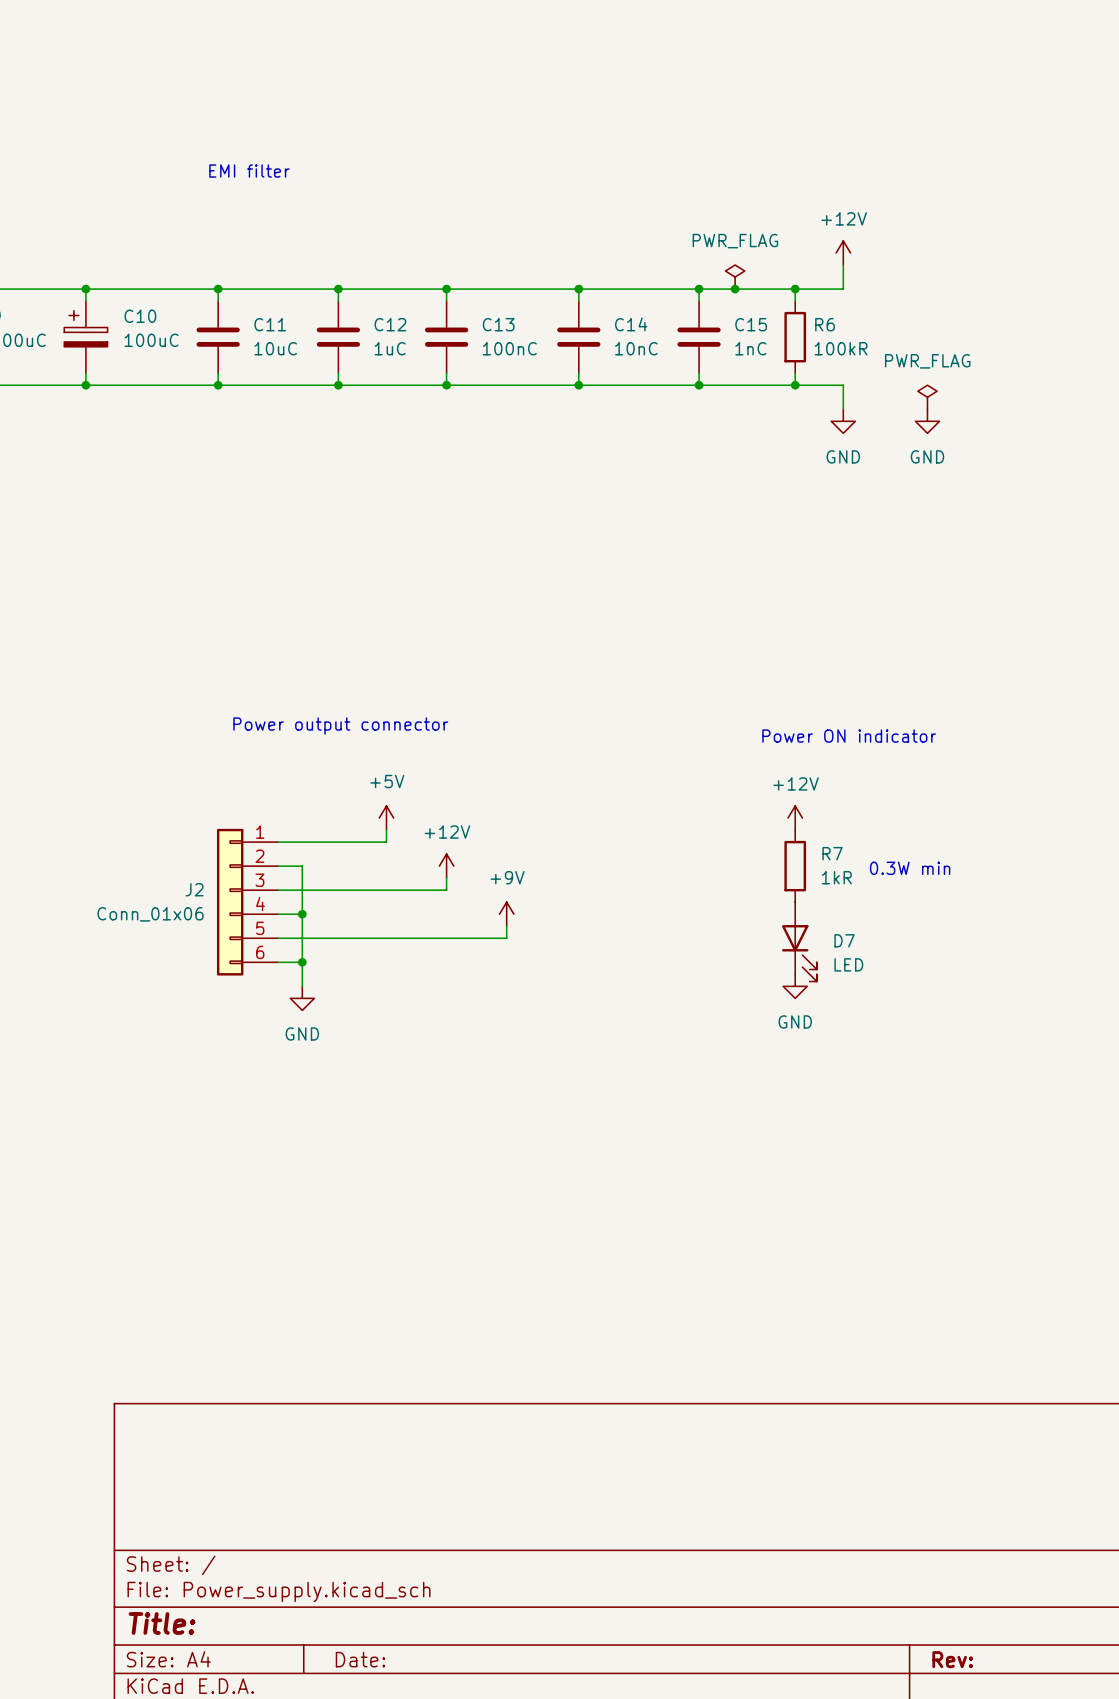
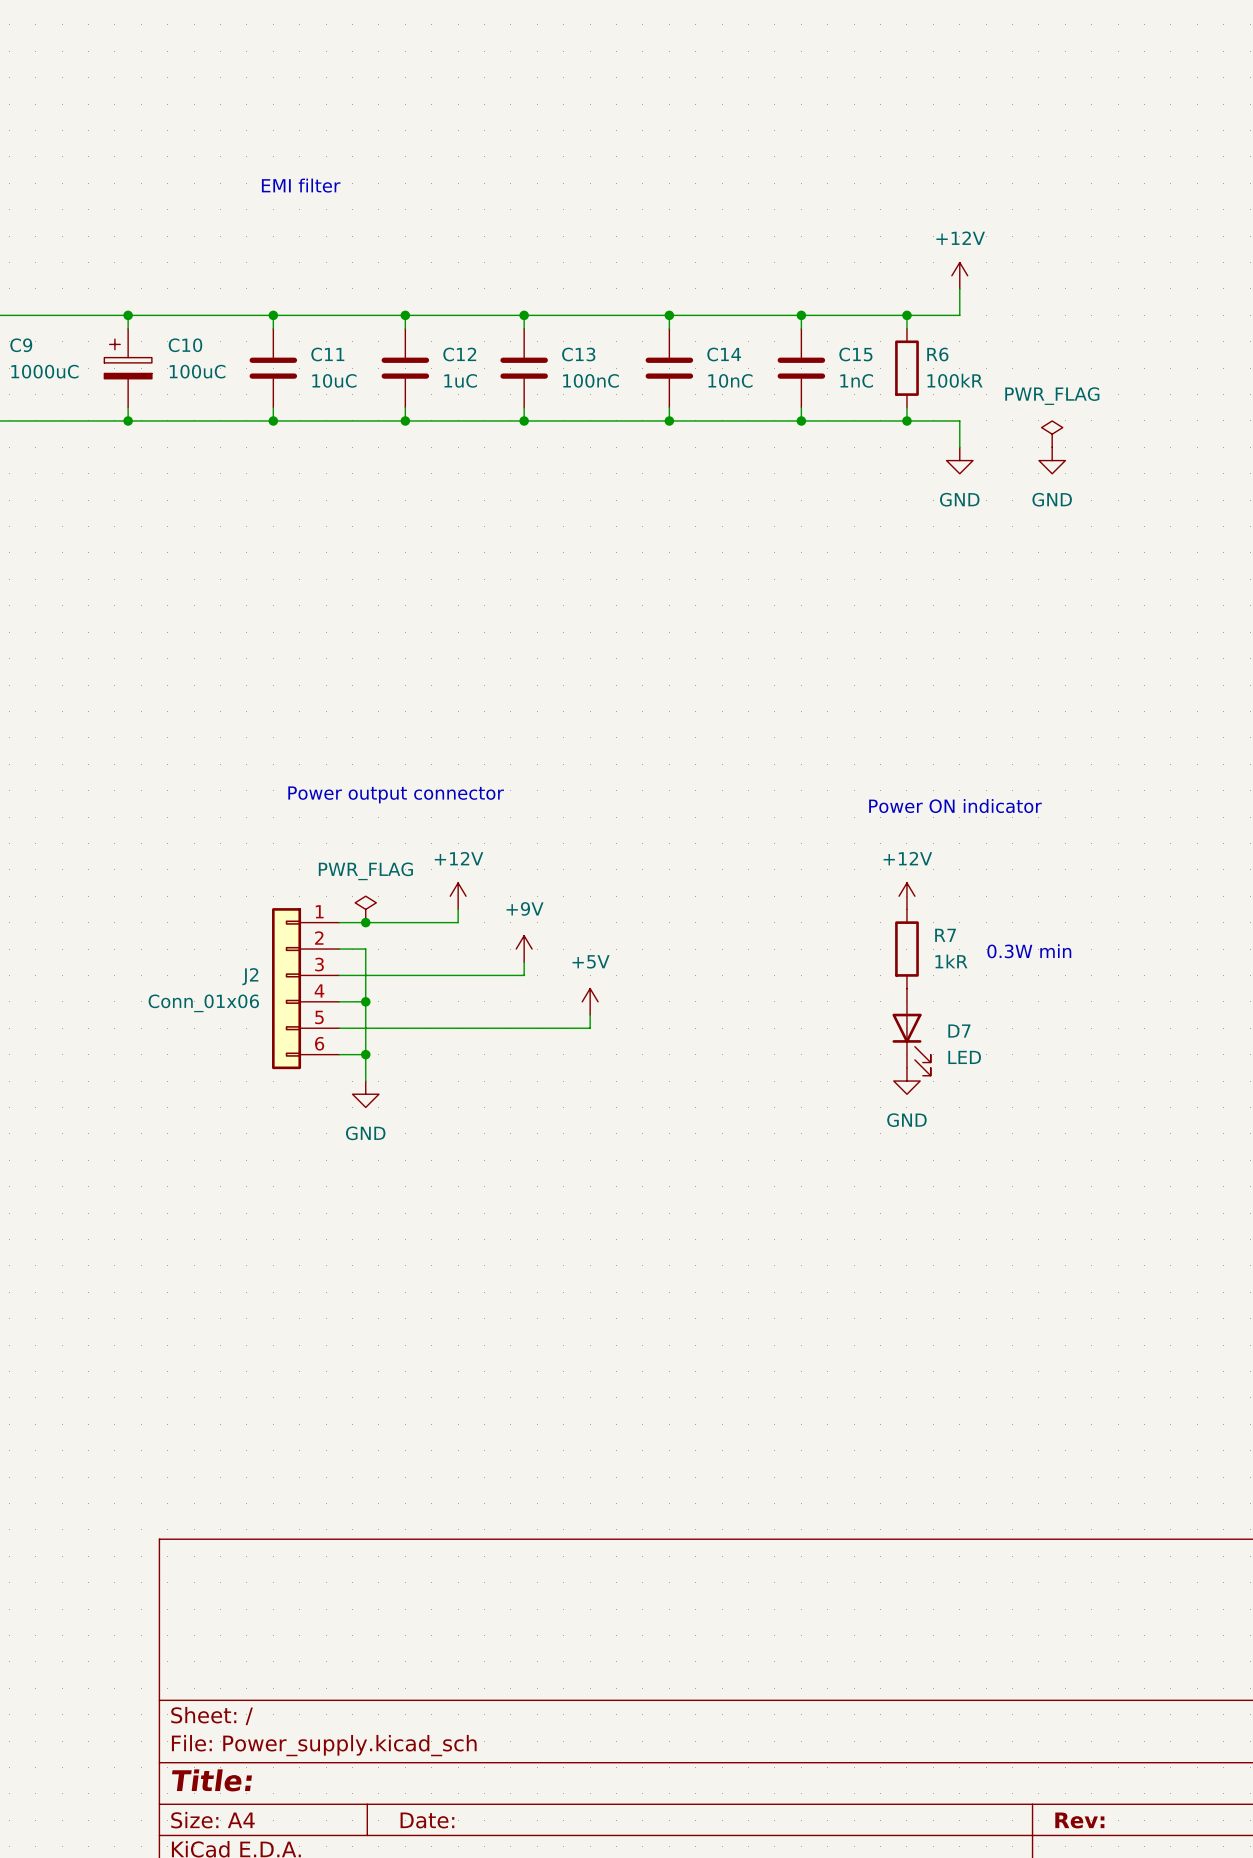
power symbol: PWR_FLAG (735, 277) -> none
junction: (735, 289) -> none
power symbol: +5V (386, 818) -> +12V (458, 896)
power symbol: none -> PWR_FLAG (365, 909)
junction: none -> (365, 922)
power symbol: +12V (446, 866) -> +9V (524, 949)
power symbol: +9V (506, 914) -> +5V (590, 1001)

